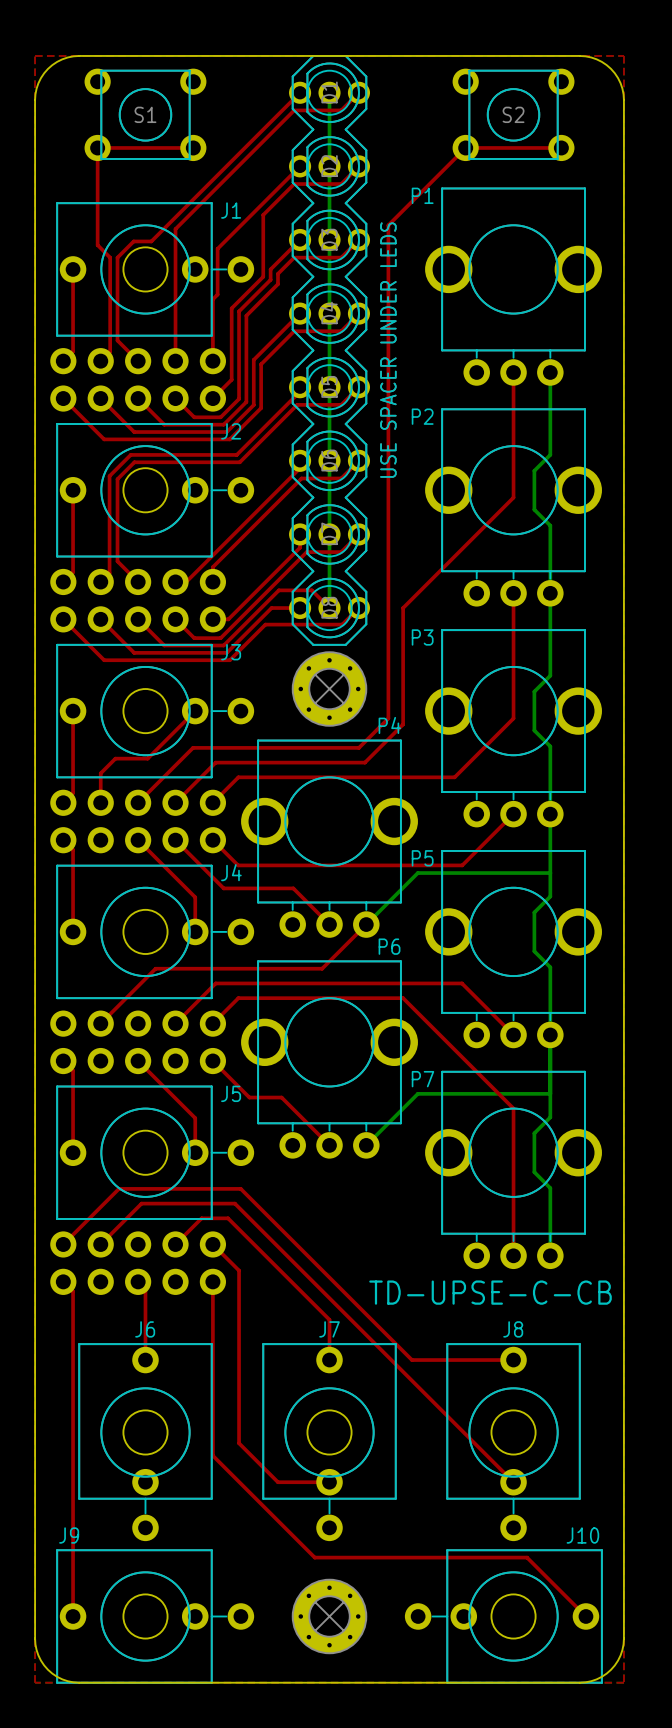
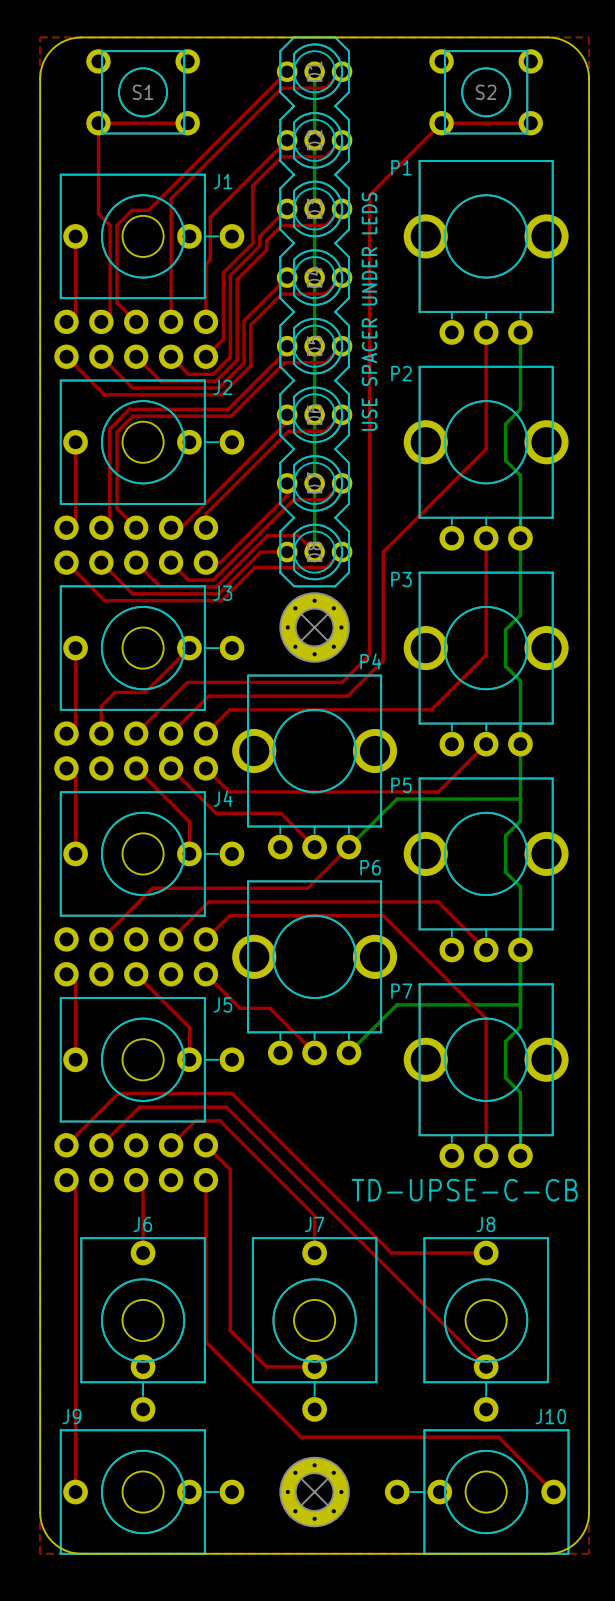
drawing shape: [291, 55, 397, 646] -> [279, 36, 378, 588]

